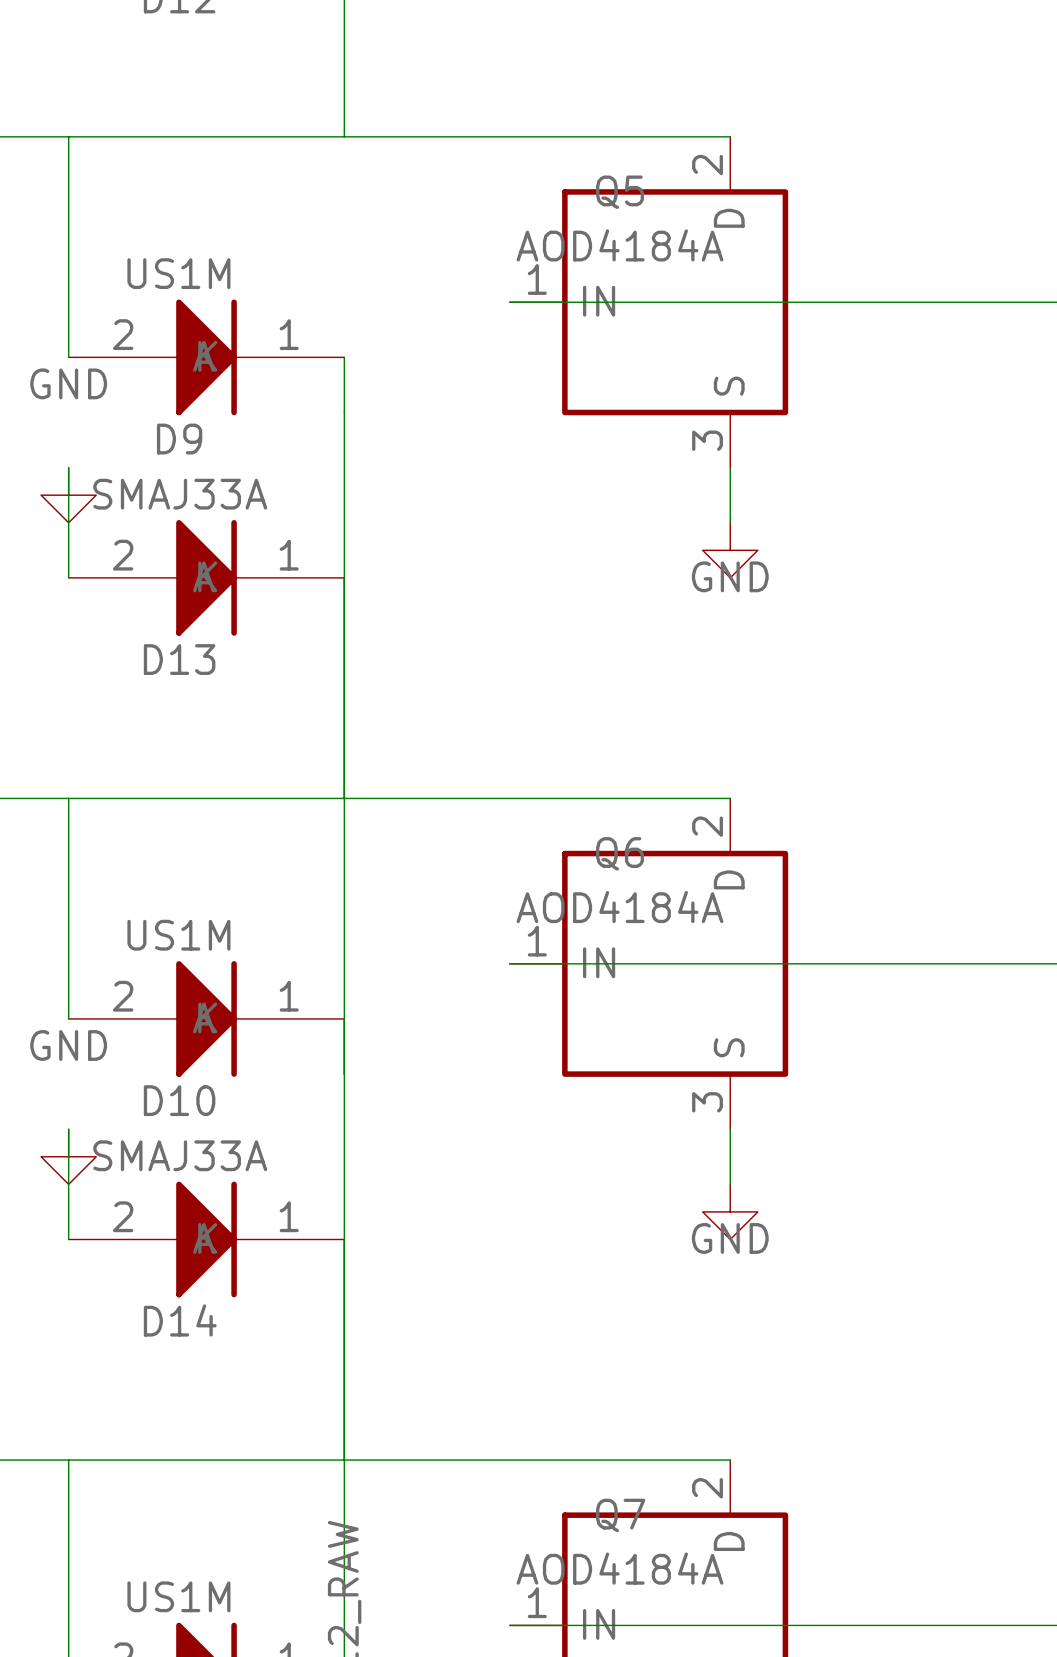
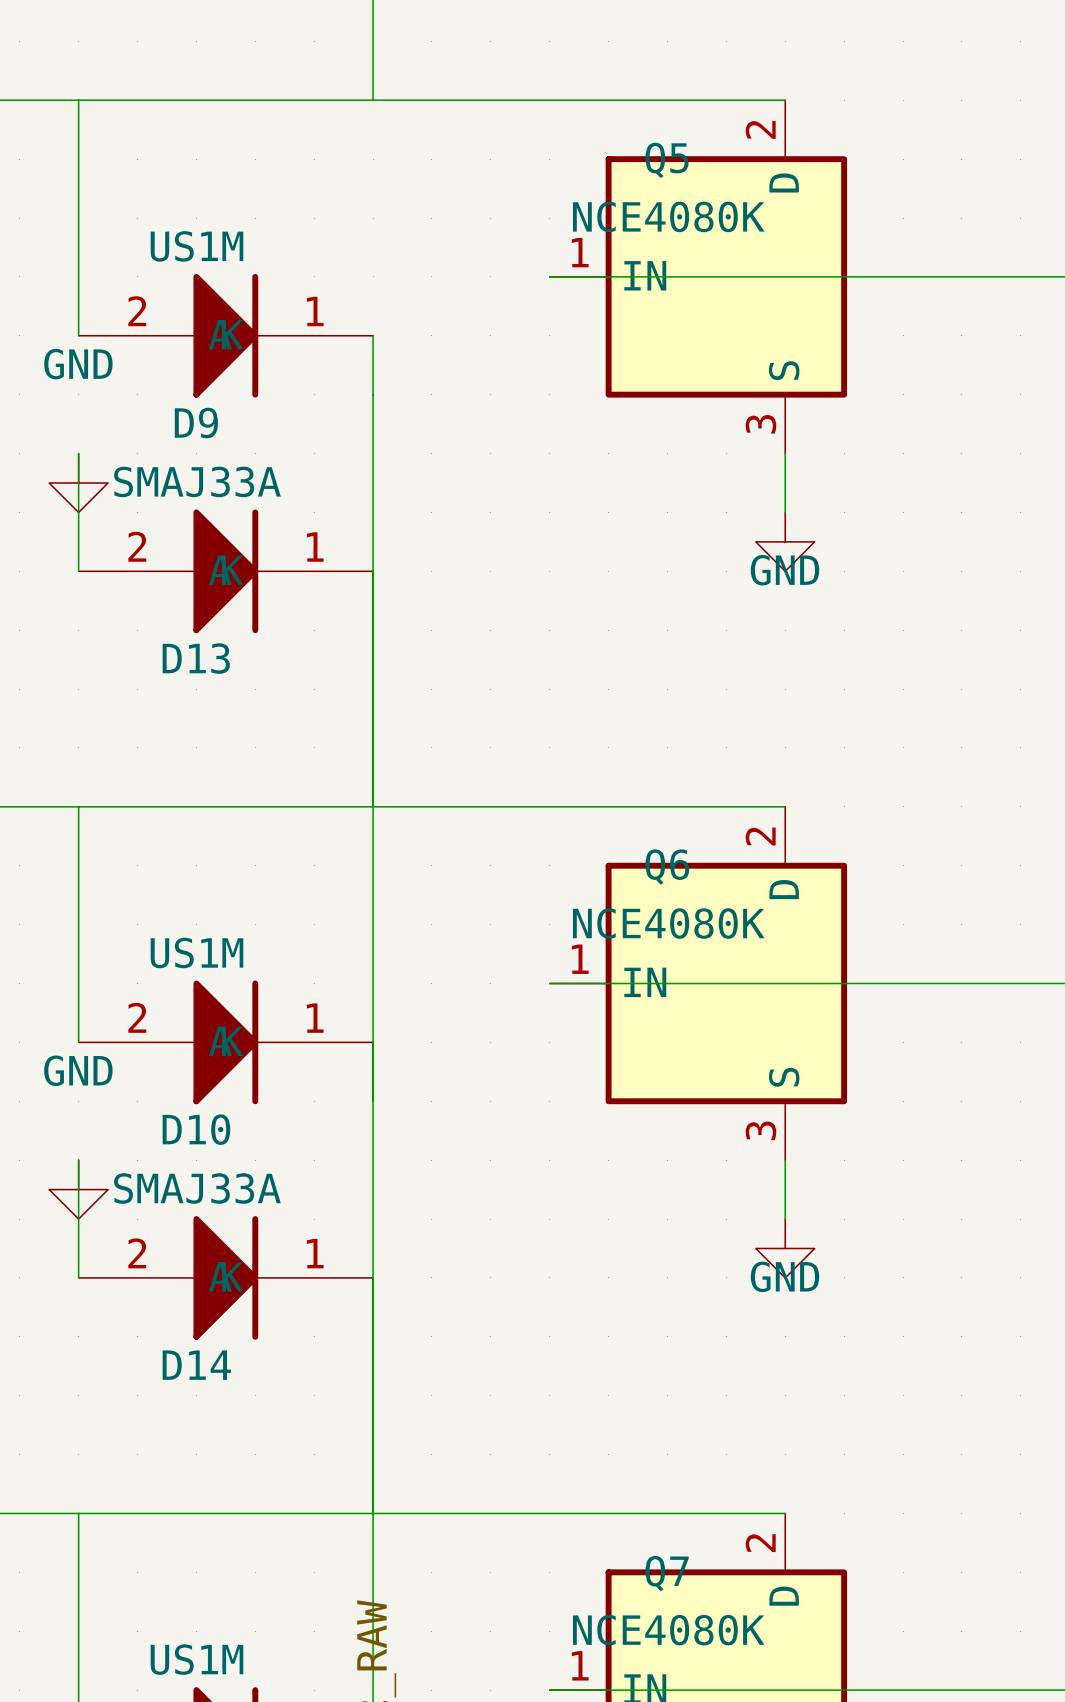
Q5 value: AOD4184A (620, 245) -> NCE4080K (668, 216)
Q6 value: AOD4184A (620, 907) -> NCE4080K (668, 923)
Q7 value: AOD4184A (620, 1568) -> NCE4080K (668, 1630)

